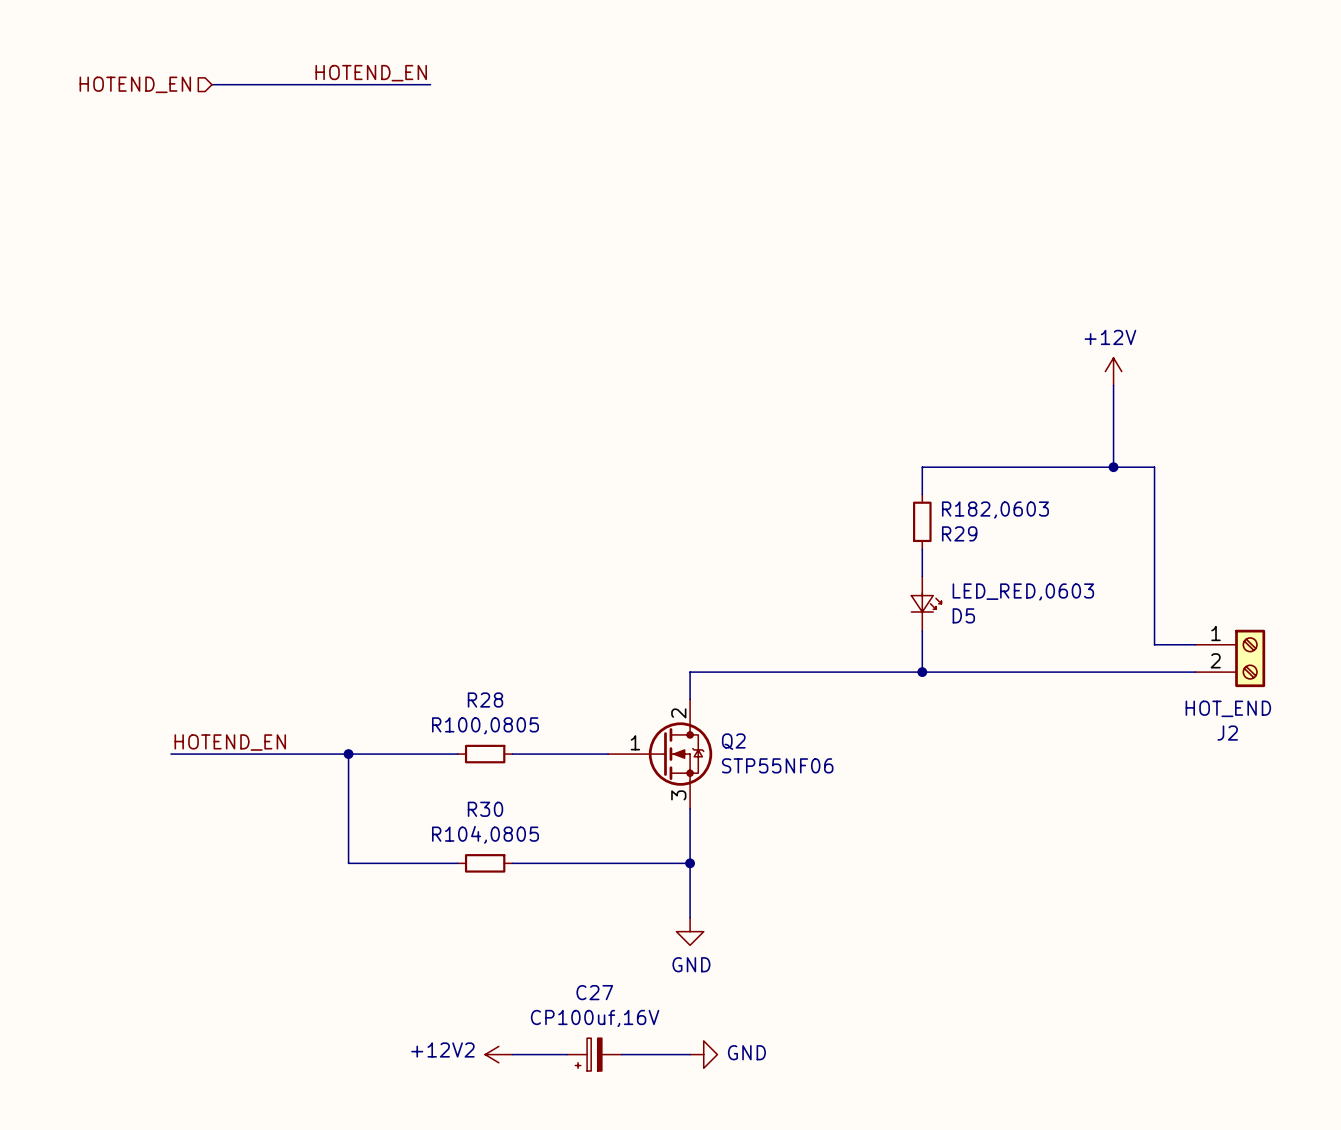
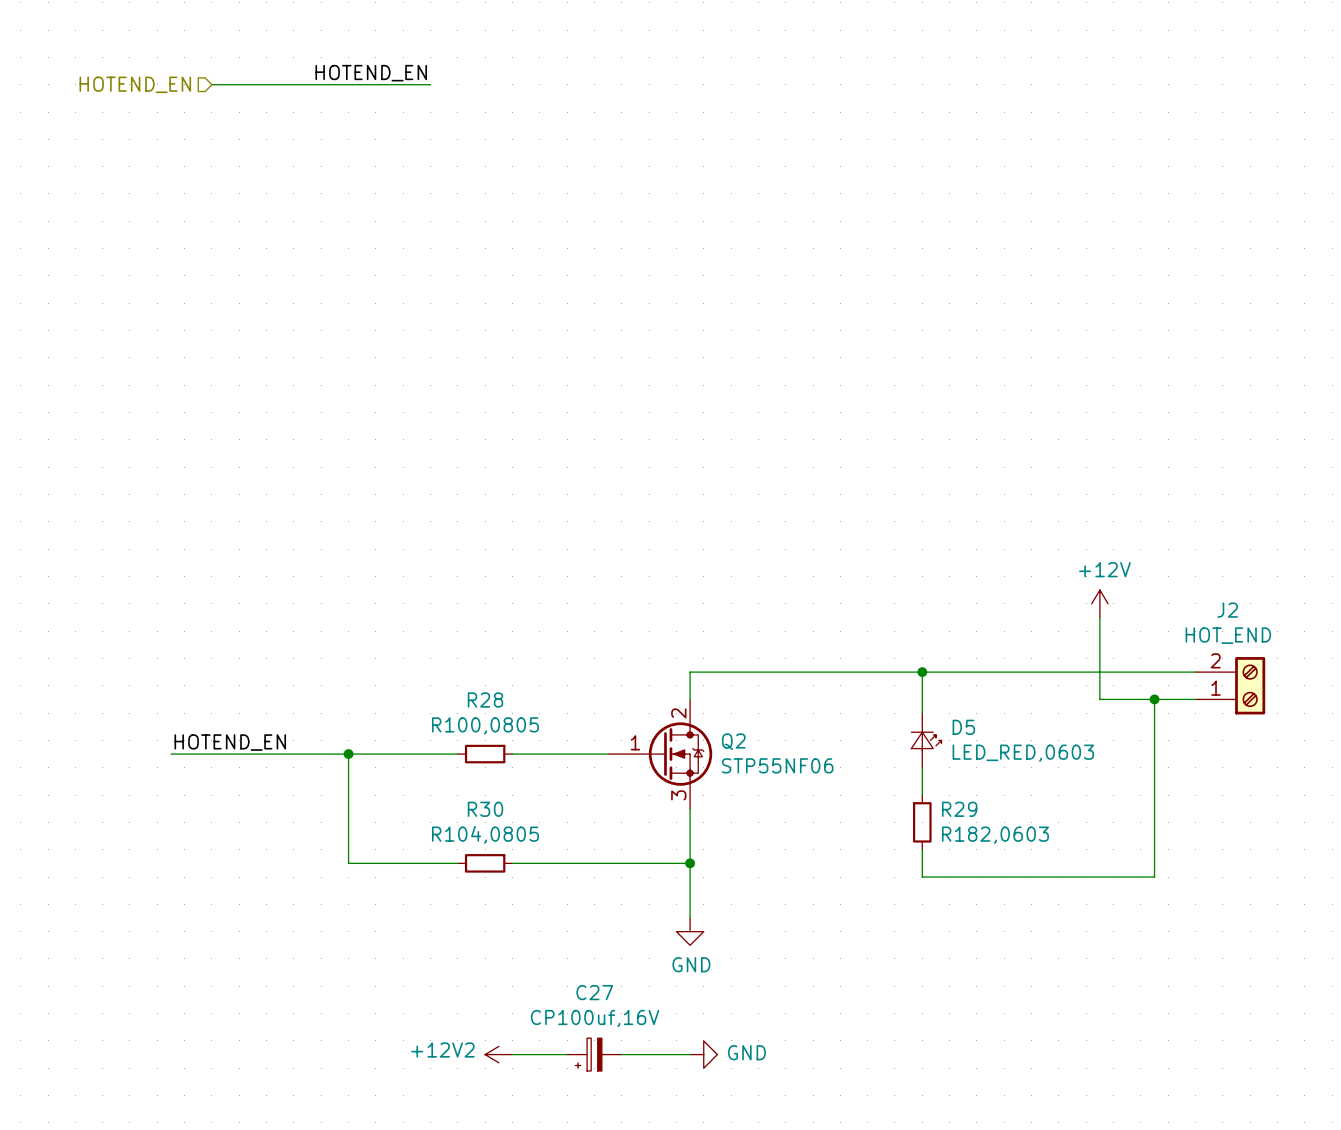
power symbol text position: +12V (1110, 337) -> +12V (1104, 569)
power symbol position: +12V (1113, 371) -> +12V (1099, 603)
wire: (1113, 385) (1113, 467) -> none
junction: (1113, 467) -> none
wire: (922, 494) (922, 467) (1154, 467) (1154, 644) (1195, 644) -> none
R29 value position: R182,0603 (995, 510) -> R182,0603 (995, 835)
R29 position: (922, 521) -> (922, 822)
R29 name position: R29 (959, 533) -> R29 (959, 809)
wire: (922, 549) (922, 576) -> (922, 767) (922, 795)
D5 flip: as is (926, 602) -> up-down (926, 741)
D5 position: (926, 603) -> (926, 740)
wire: none -> (1099, 617) (1099, 699) (1195, 699)
wire: (922, 631) (922, 672) -> (922, 713) (922, 672)
J2 flip: as is (1250, 658) -> up-down (1250, 685)
wire: none -> (1154, 699) (1154, 877) (922, 877) (922, 849)
junction: none -> (1154, 699)

